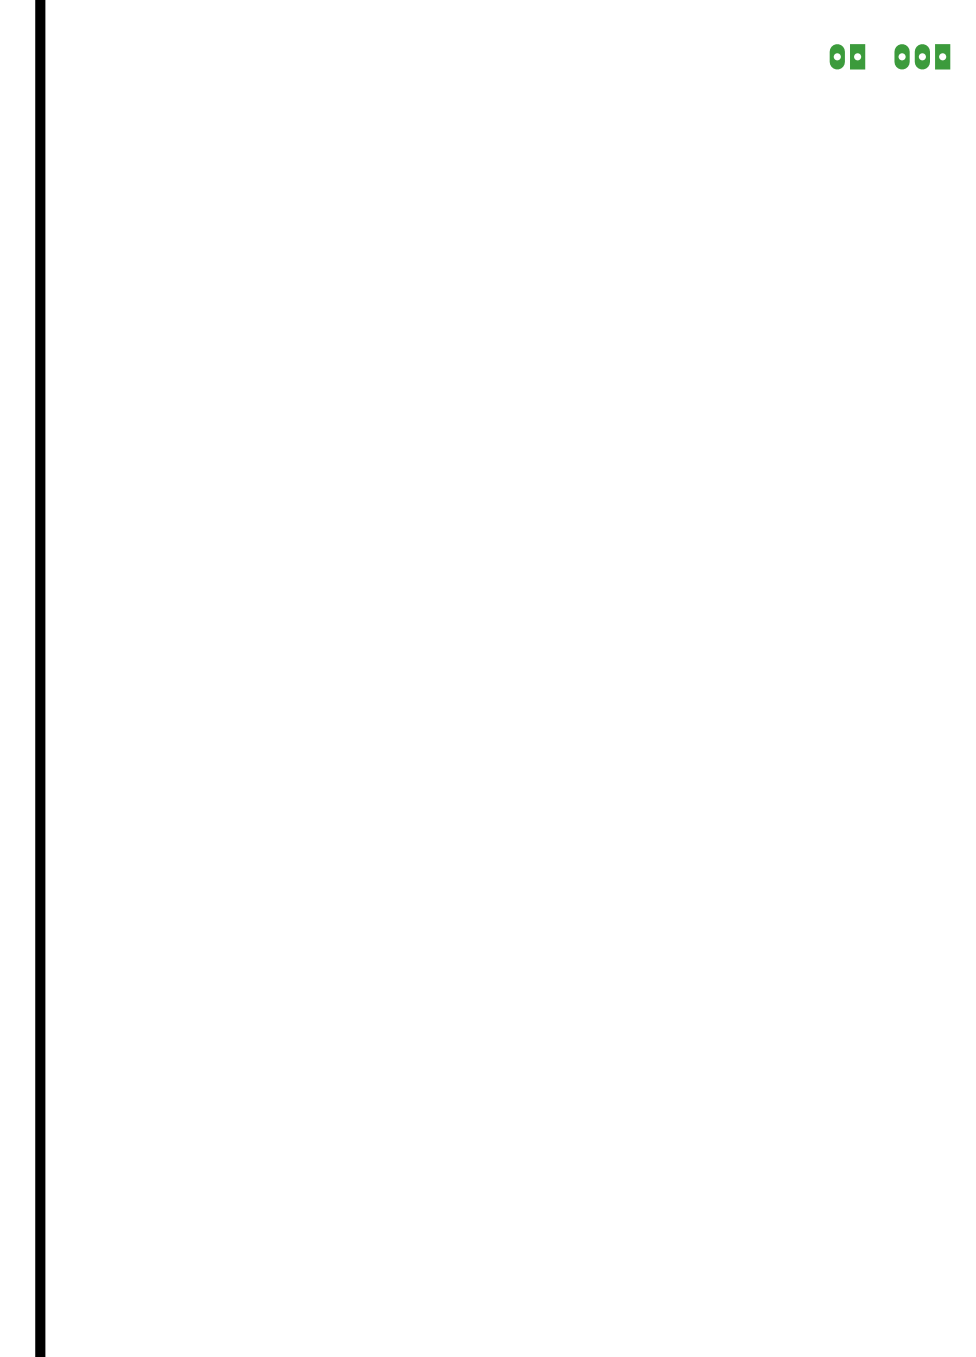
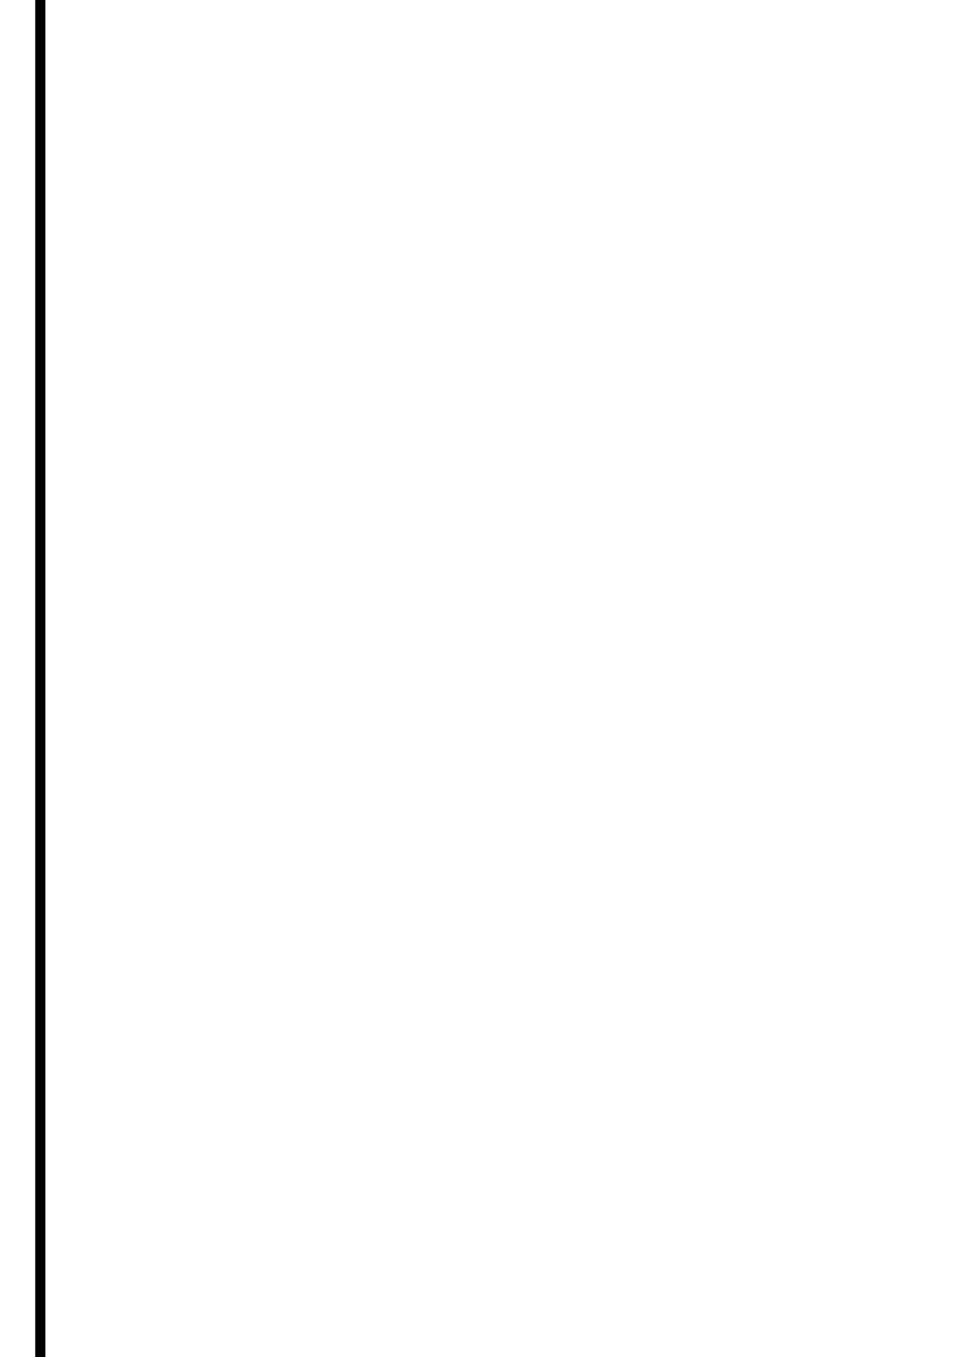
part: (847, 56) -> none
part: (922, 56) -> none

